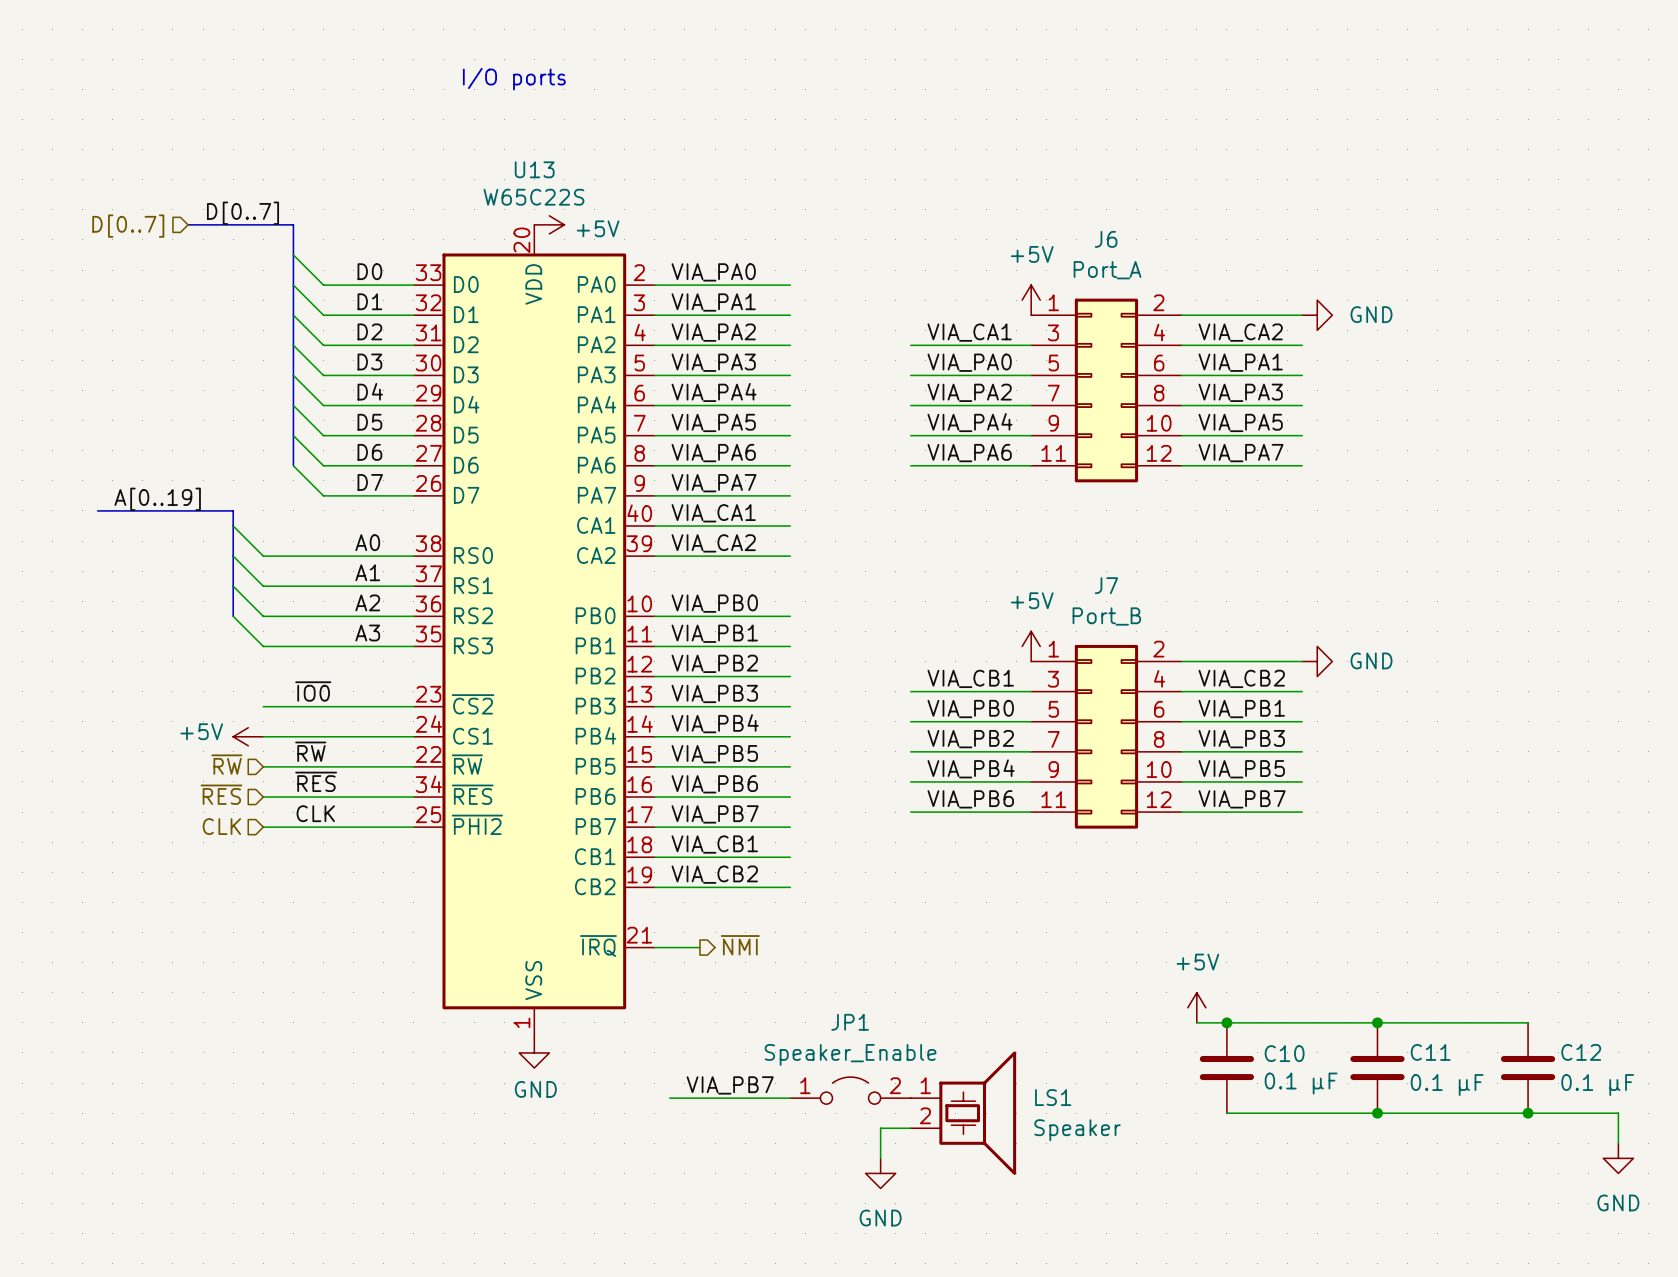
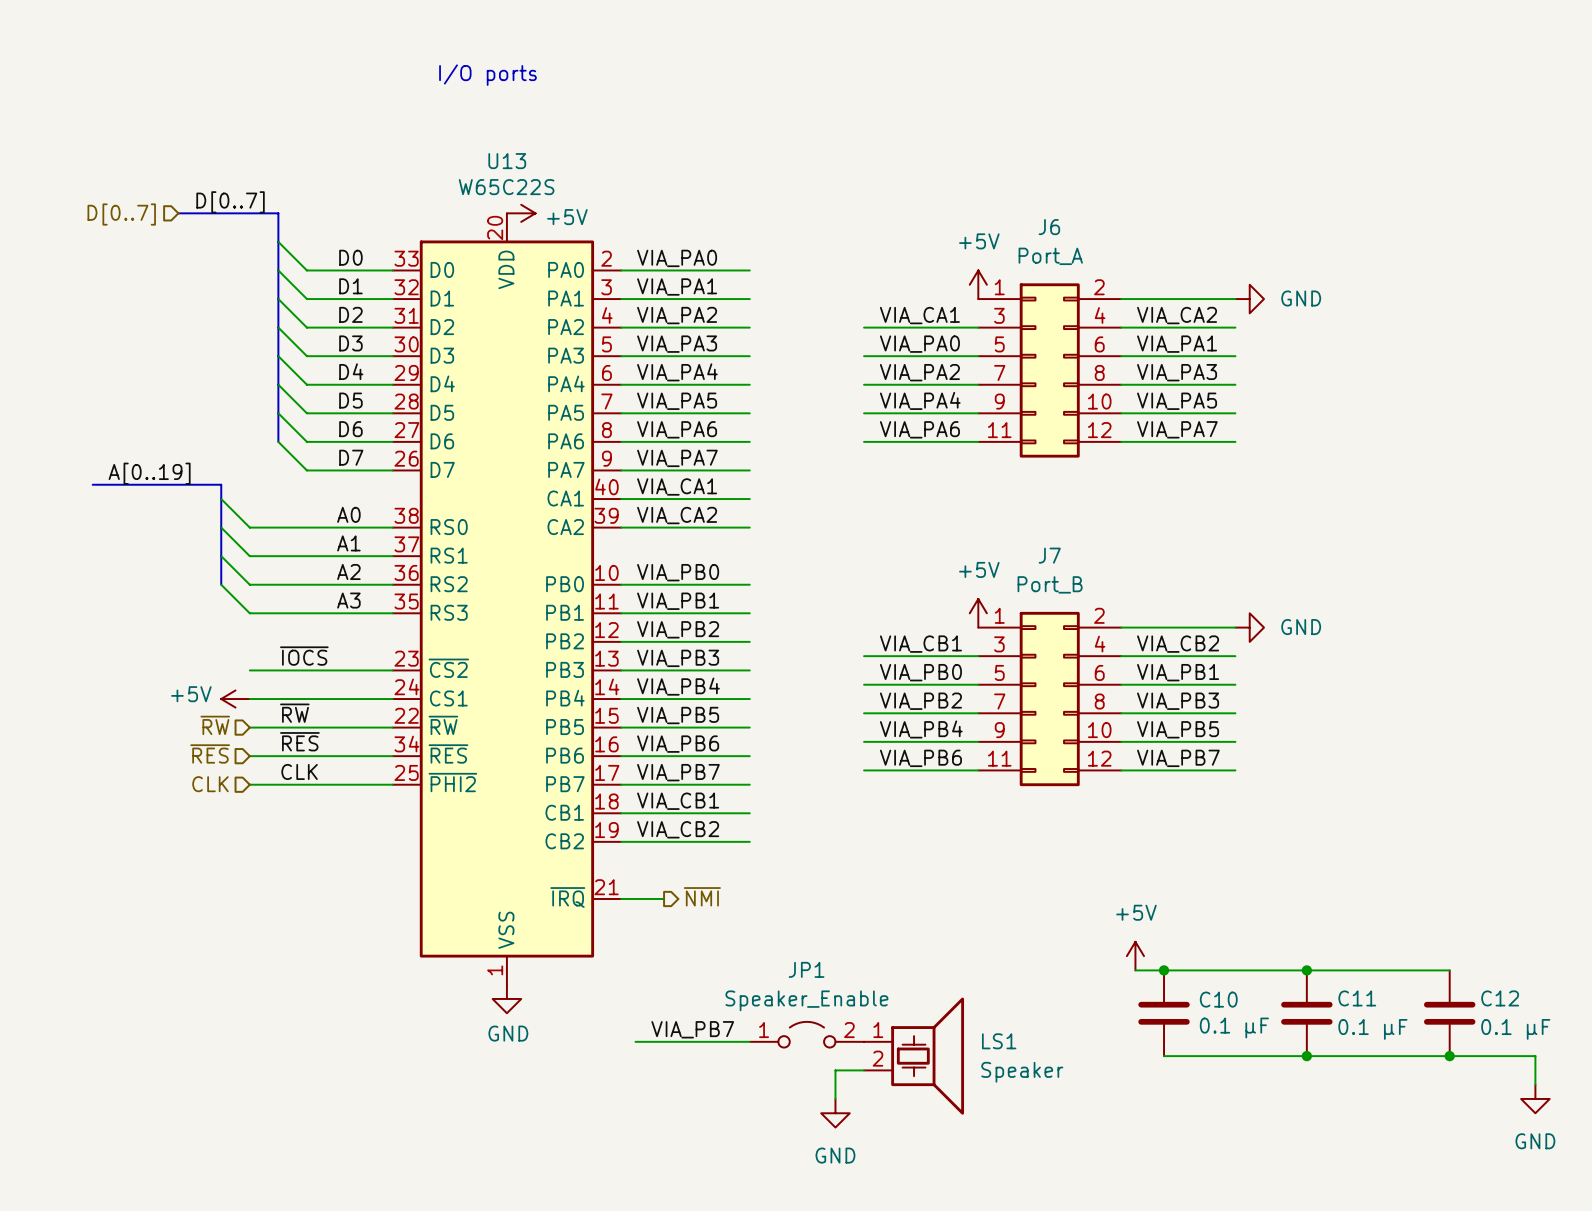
label: ~{IO0} (313, 691) -> ~{IOCS} (304, 656)

